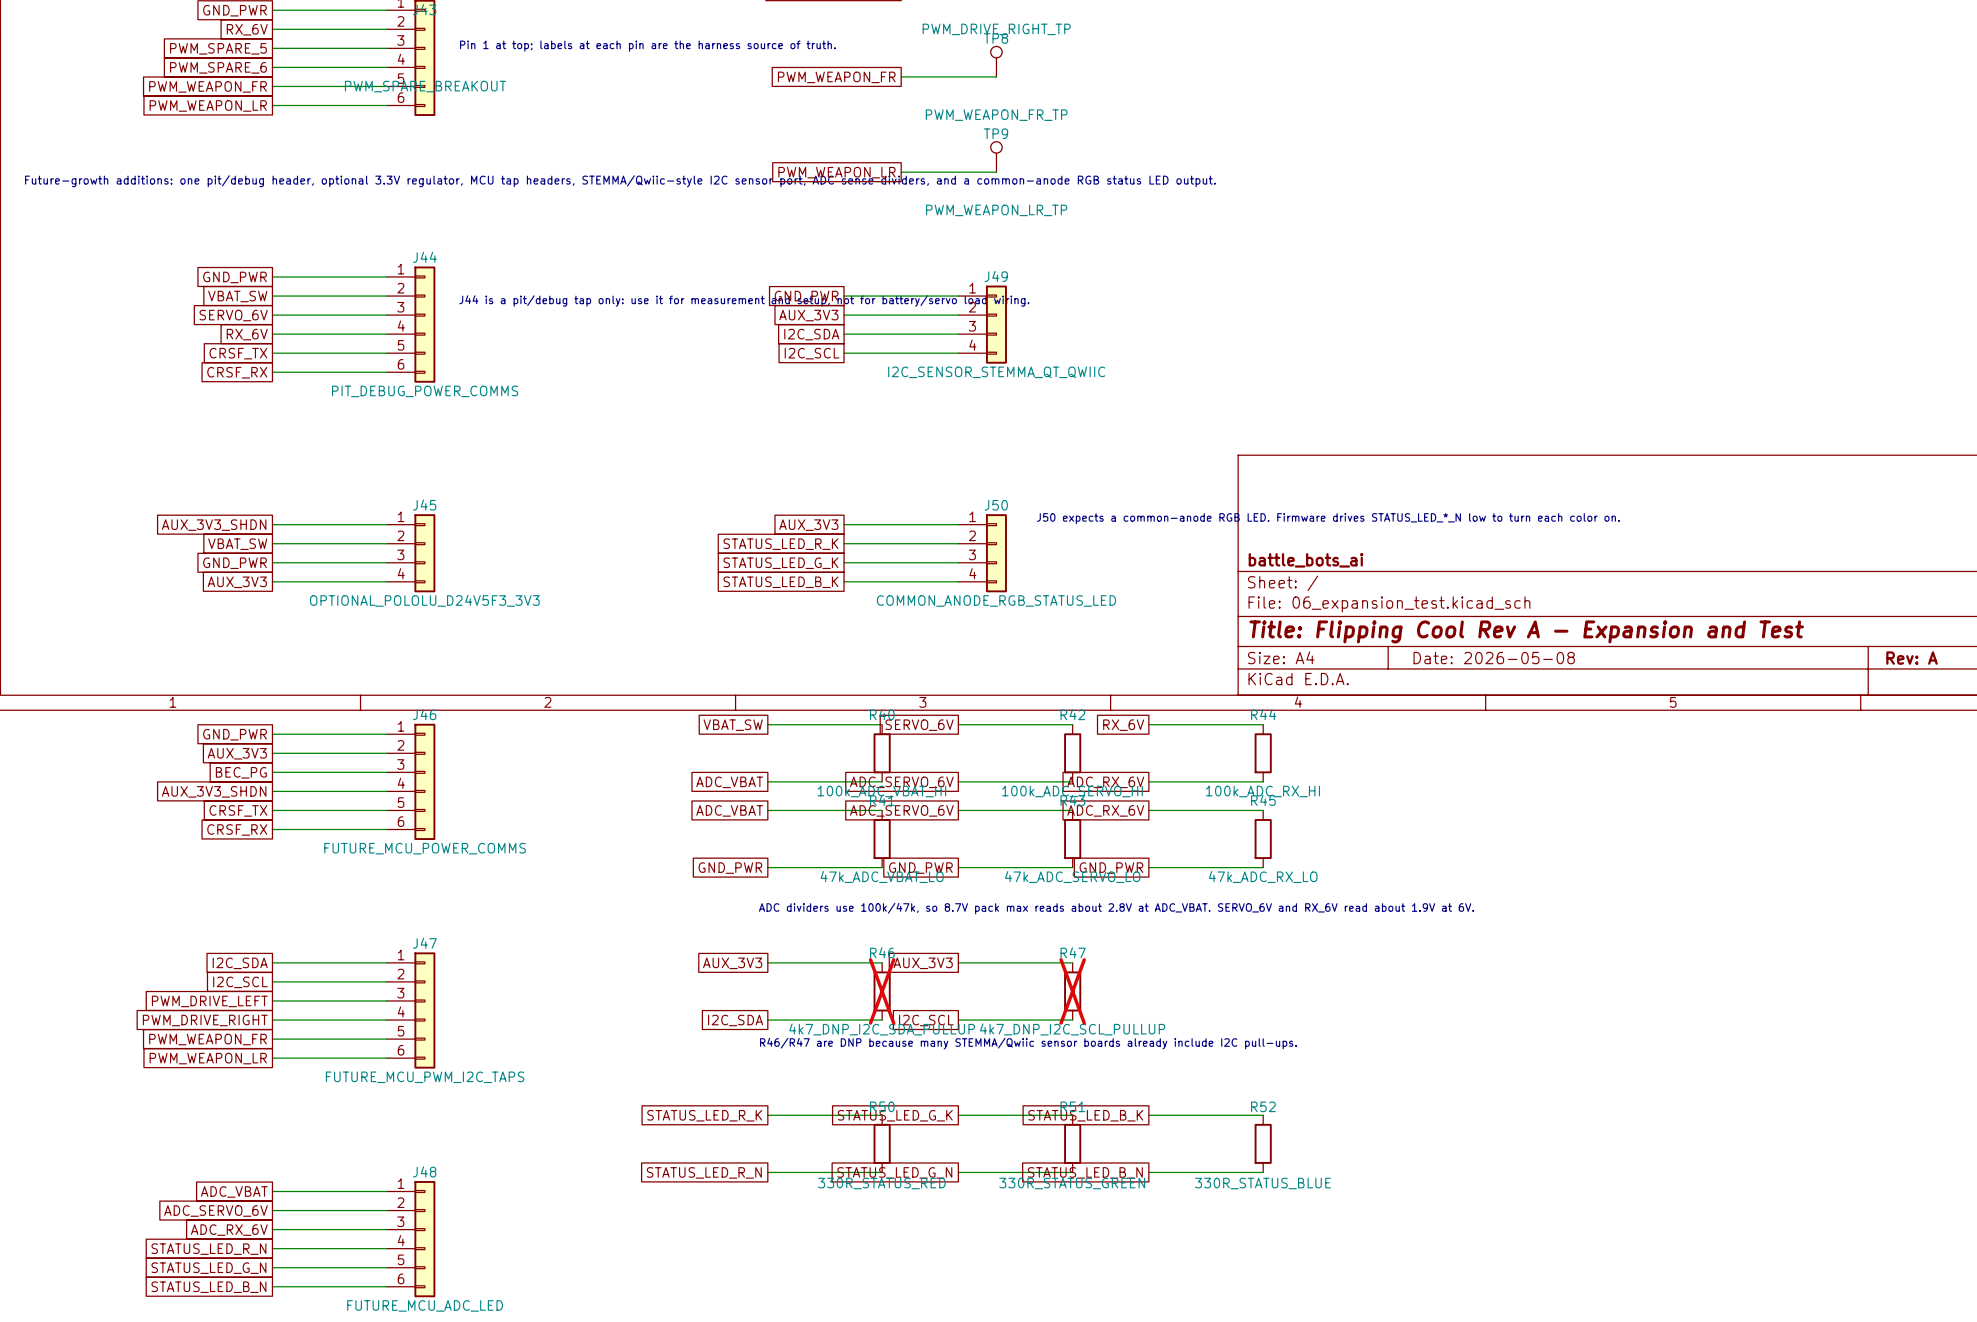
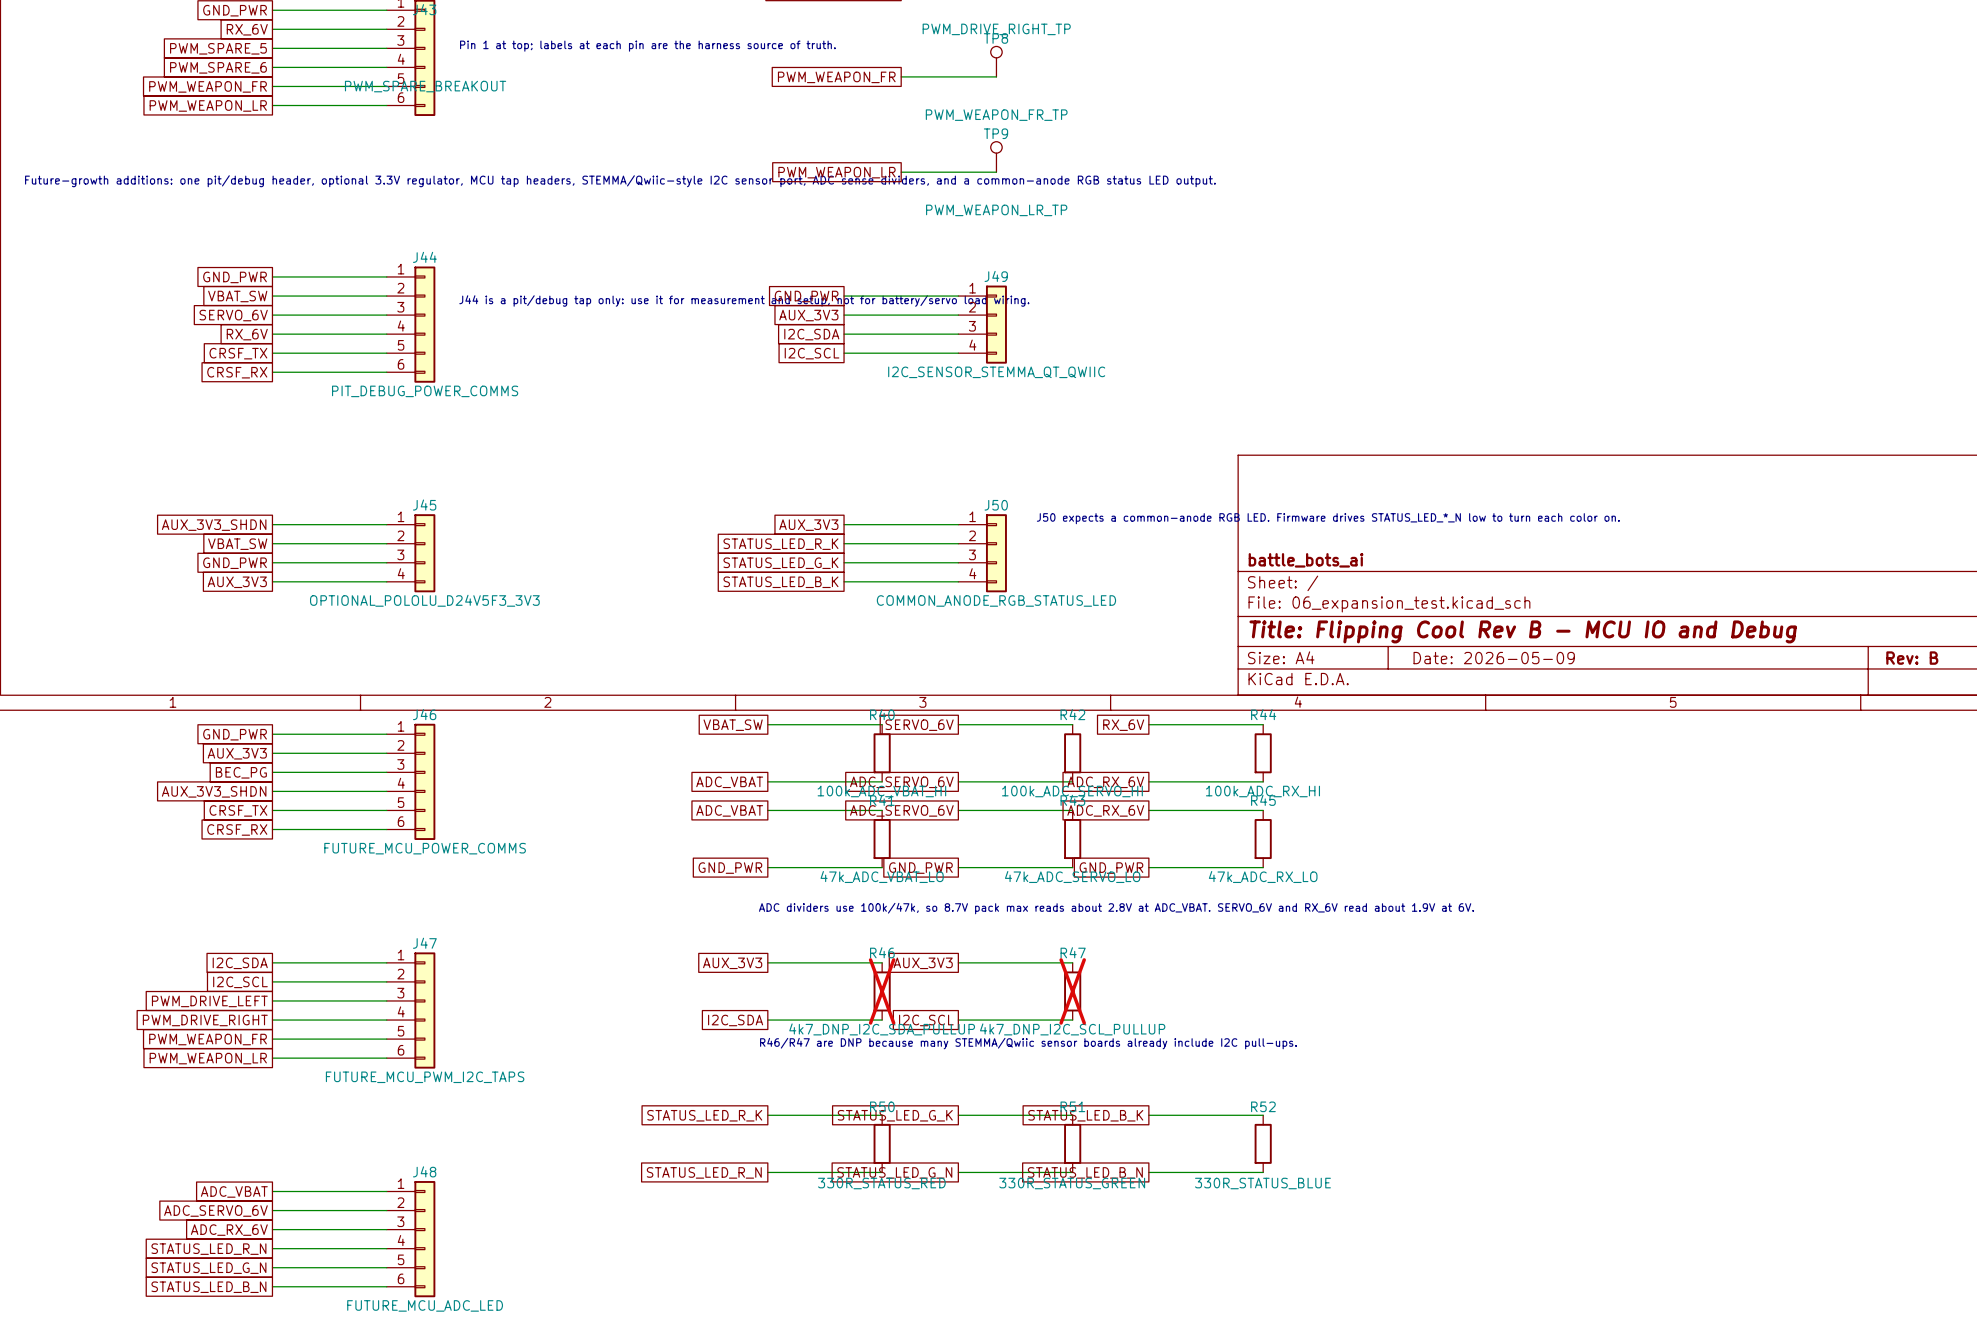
title block: Title: Flipping Cool Rev A - Expansion and Test (1526, 631) -> Title: Flipping Cool Rev B - MCU IO and Debug (1523, 631)
title block: Date: 2026-05-08 (1494, 658) -> Date: 2026-05-09 (1494, 658)
title block: Rev: A (1912, 658) -> Rev: B (1912, 658)

